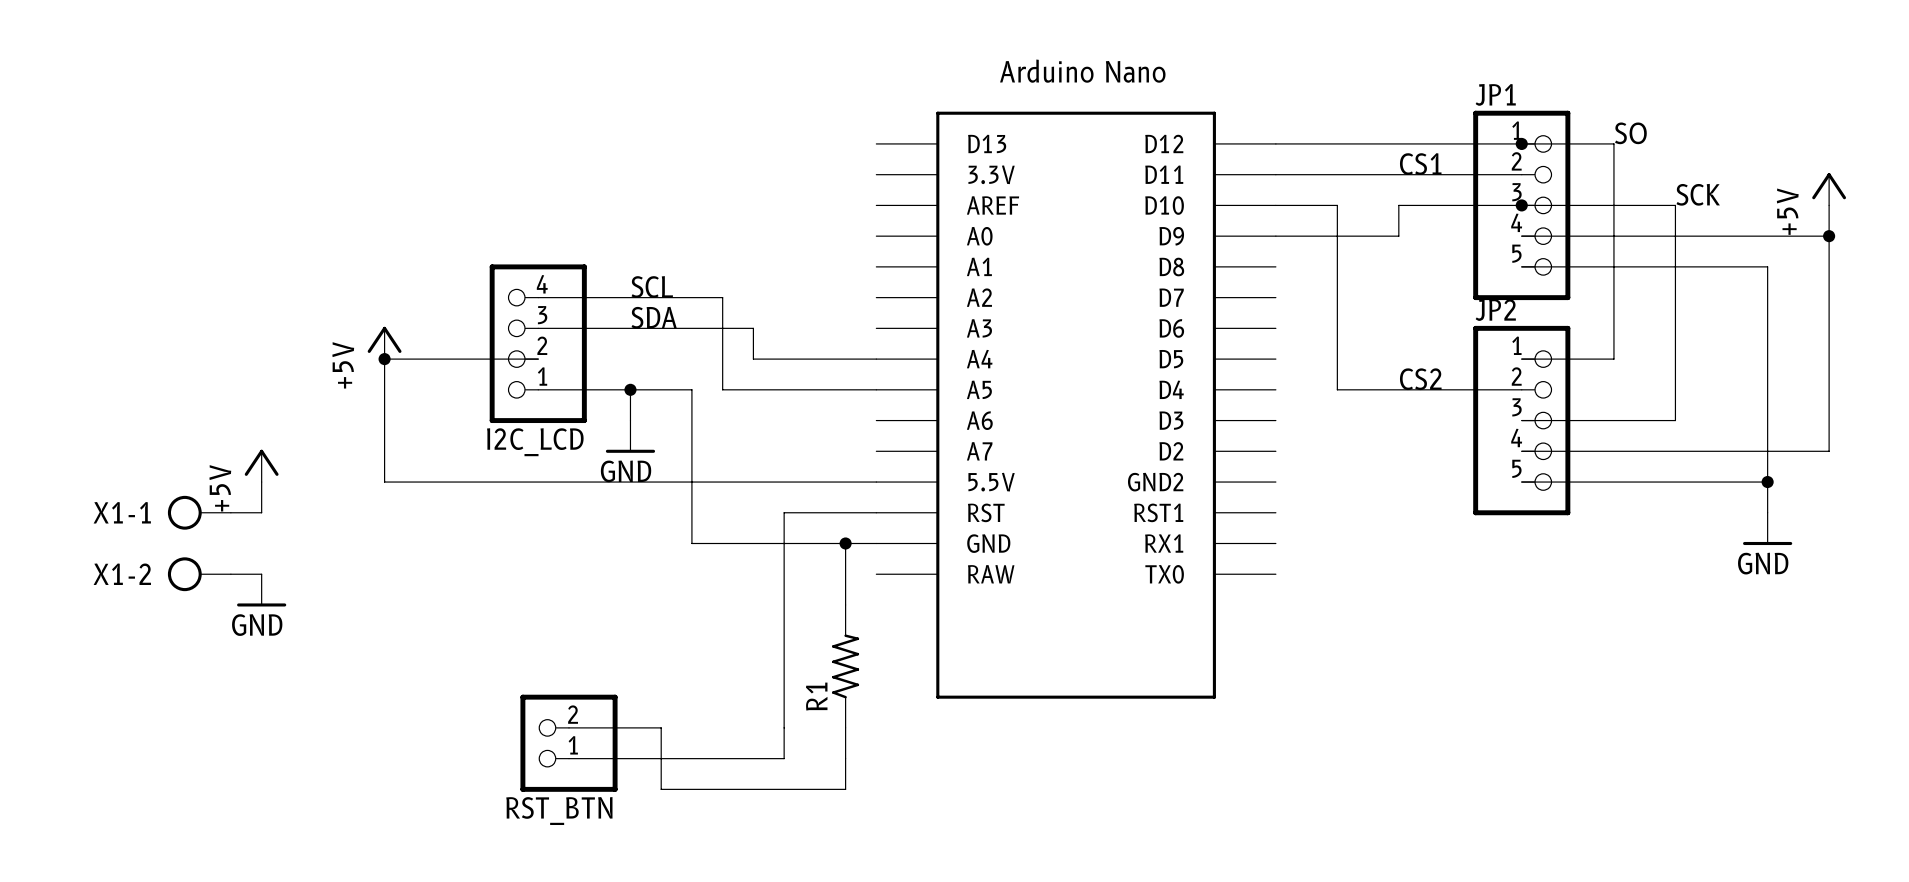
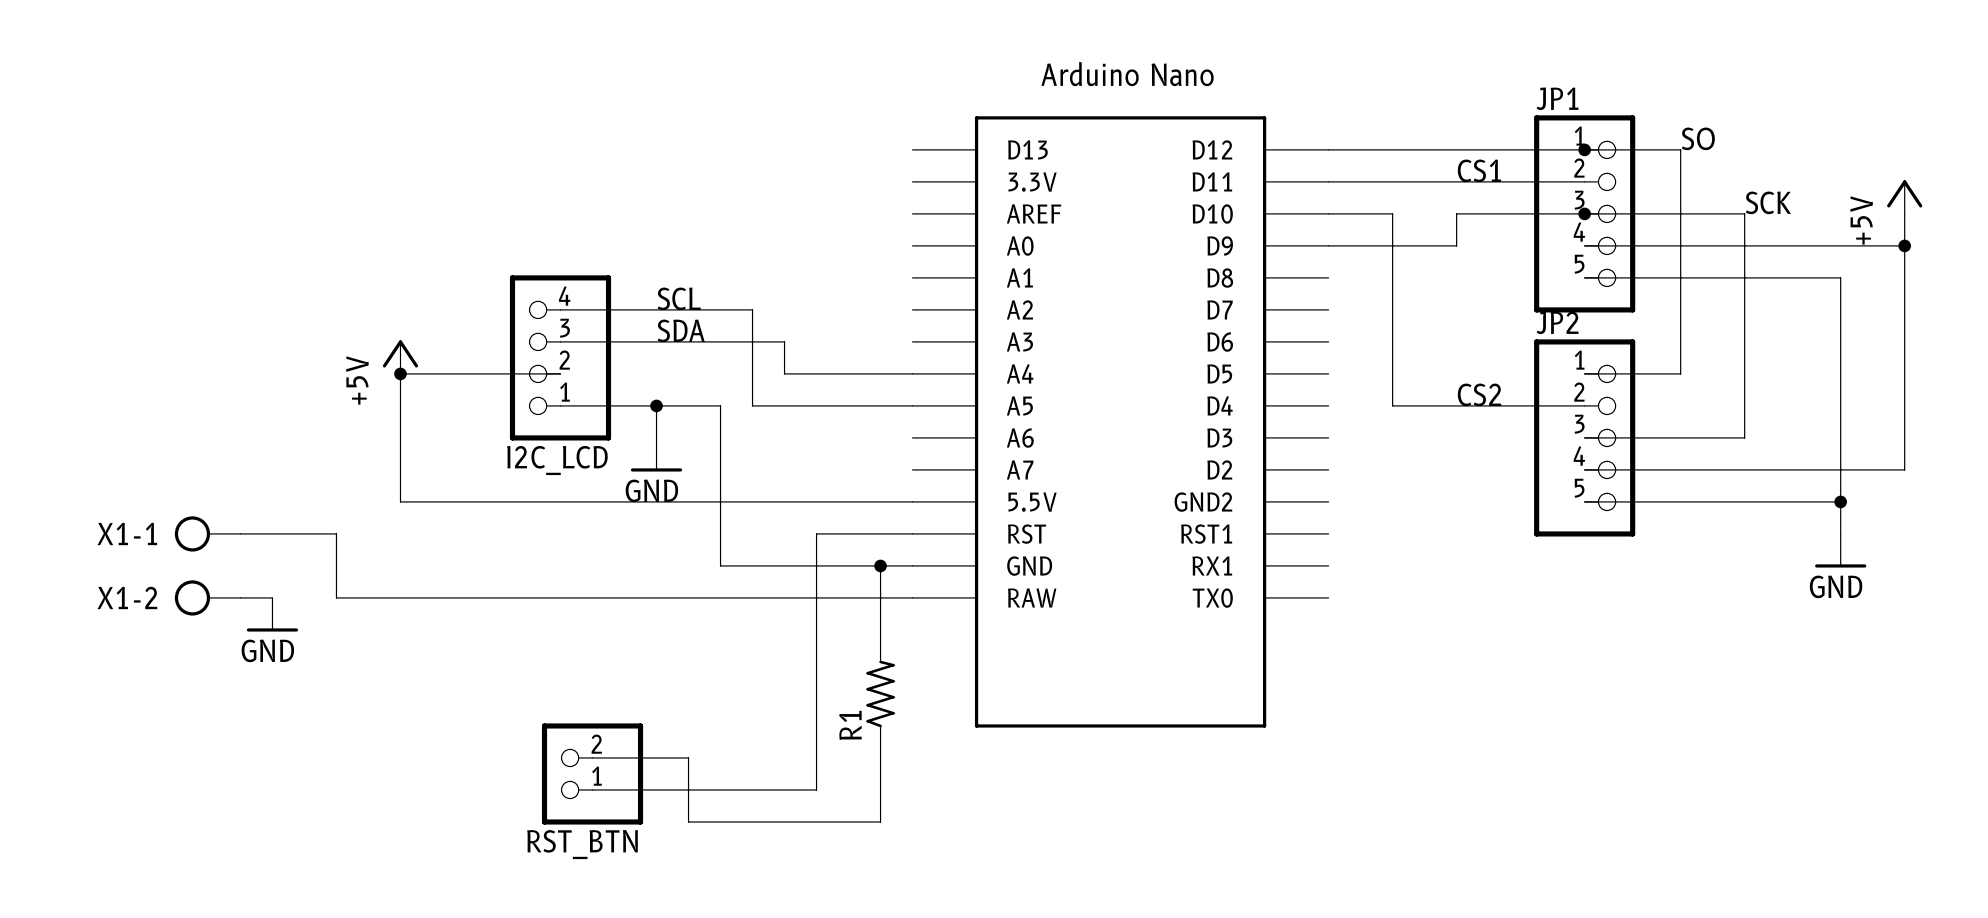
power symbol: +5V (261, 465) -> none
wire: (261, 482) (261, 512) -> (912, 597) (336, 597) (336, 533) (272, 533)

